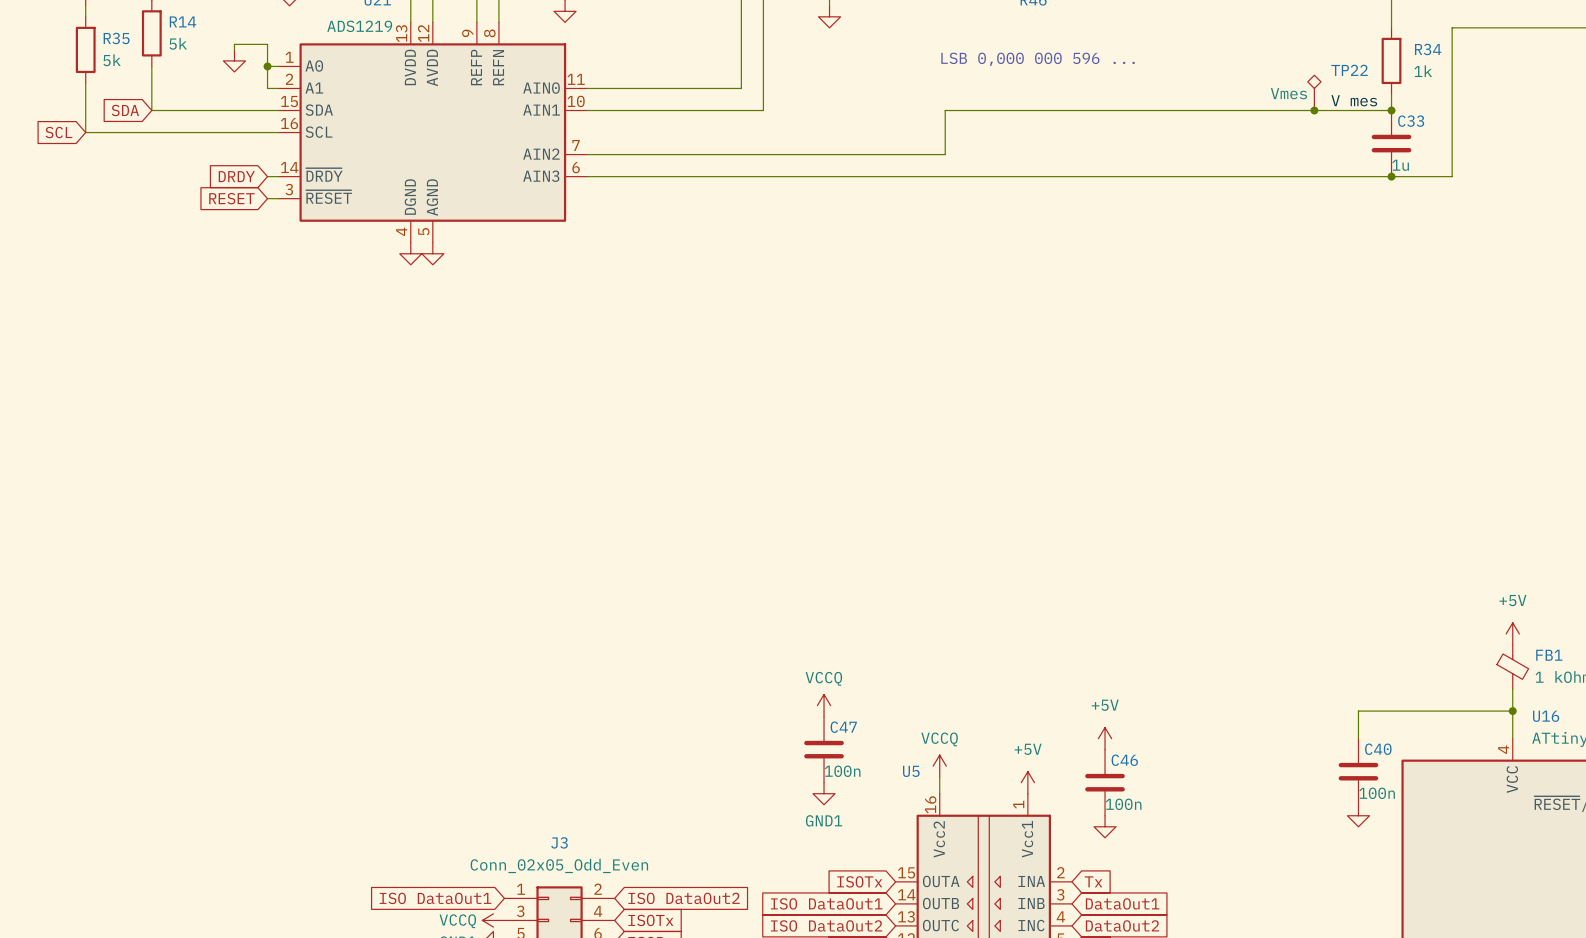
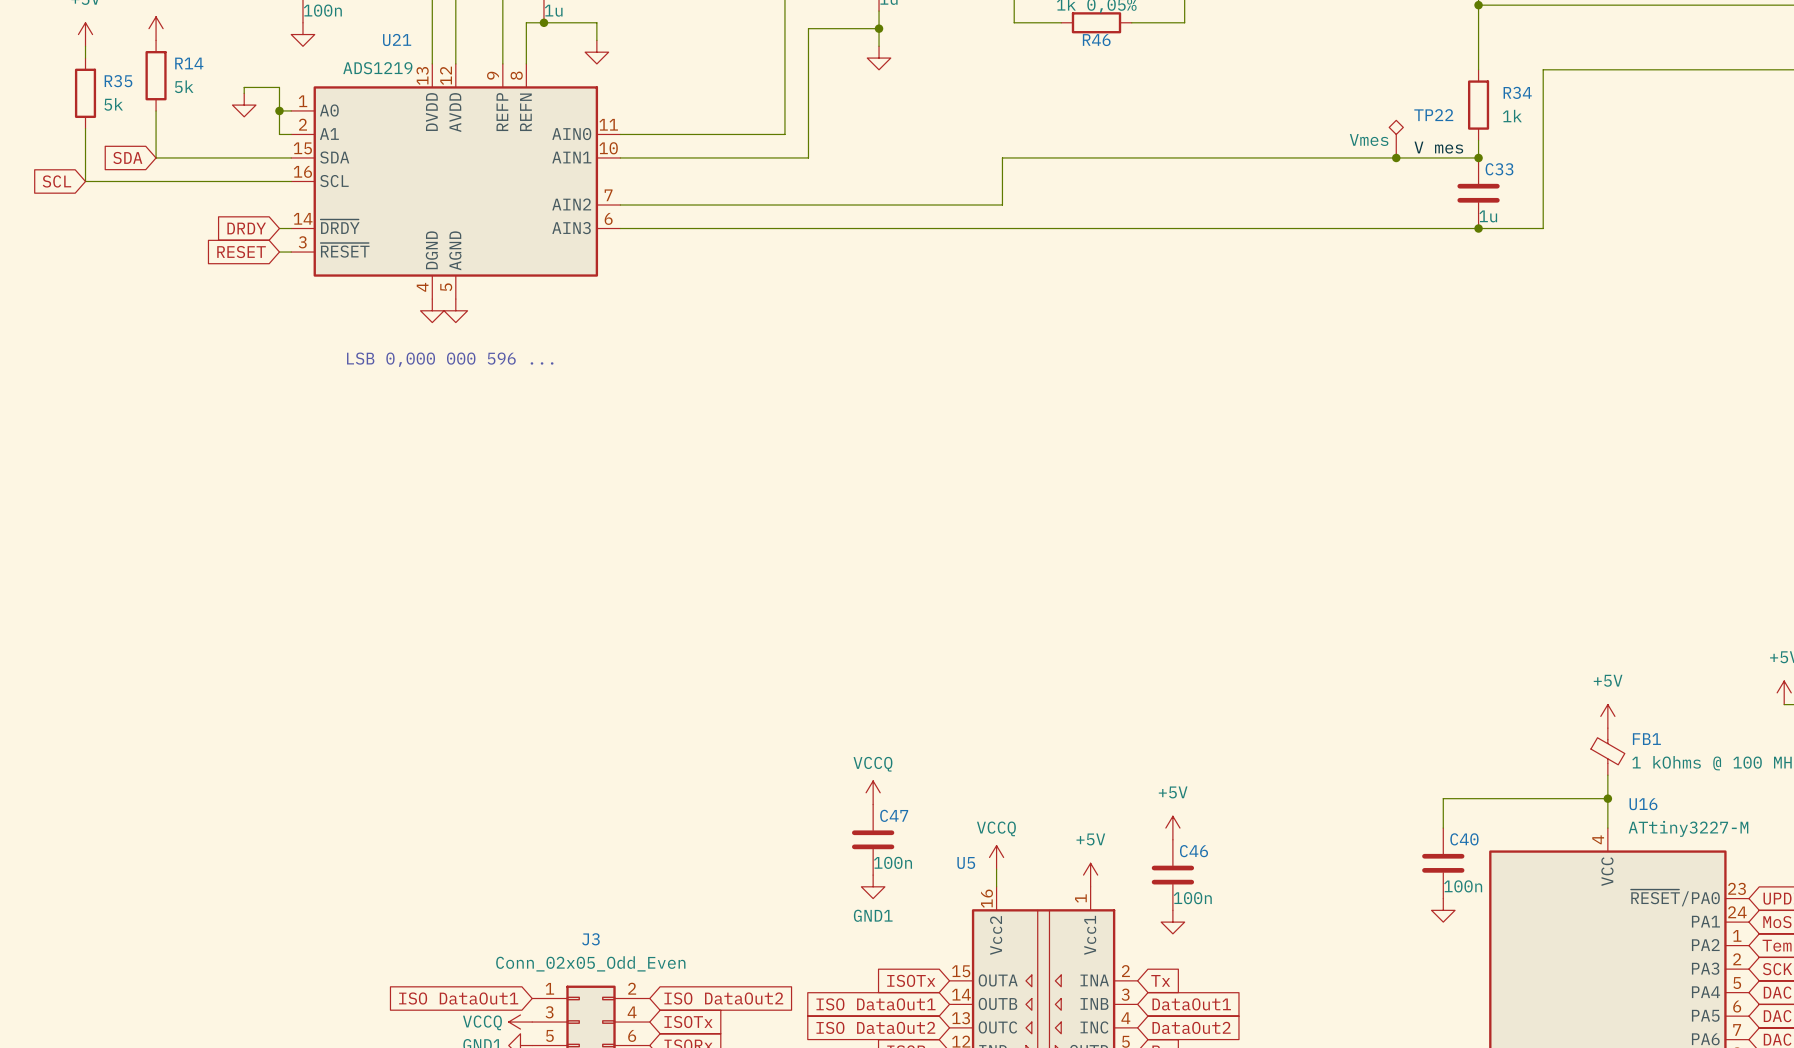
text: LSB 0,000 000 596 ... (1038, 59) -> none
text: none -> LSB 0,000 000 596 ... (450, 359)

